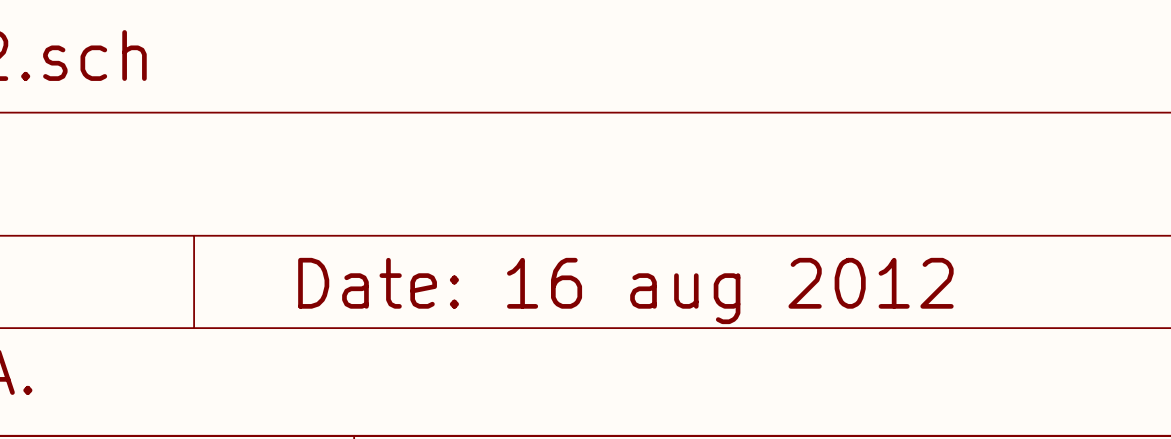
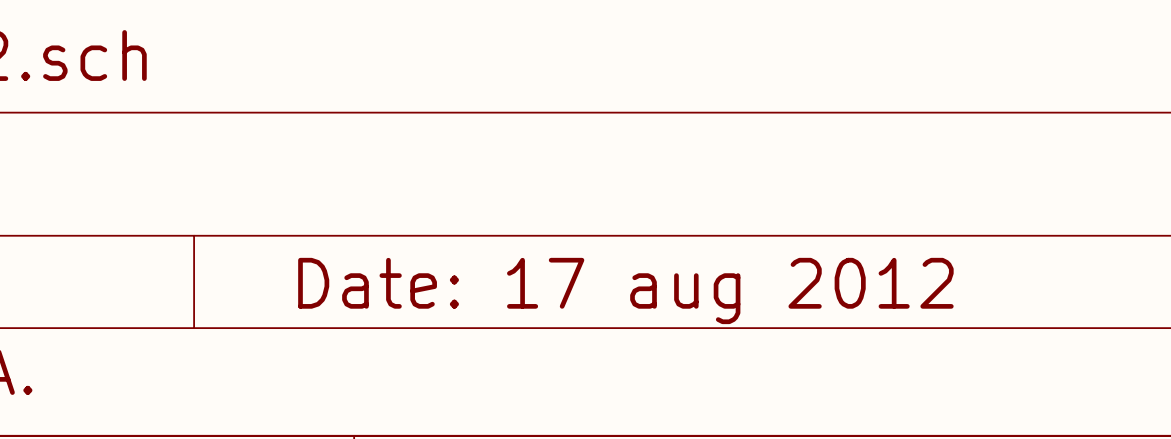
title block: Date: 16 aug 2012 (625, 290) -> Date: 17 aug 2012 (625, 290)

